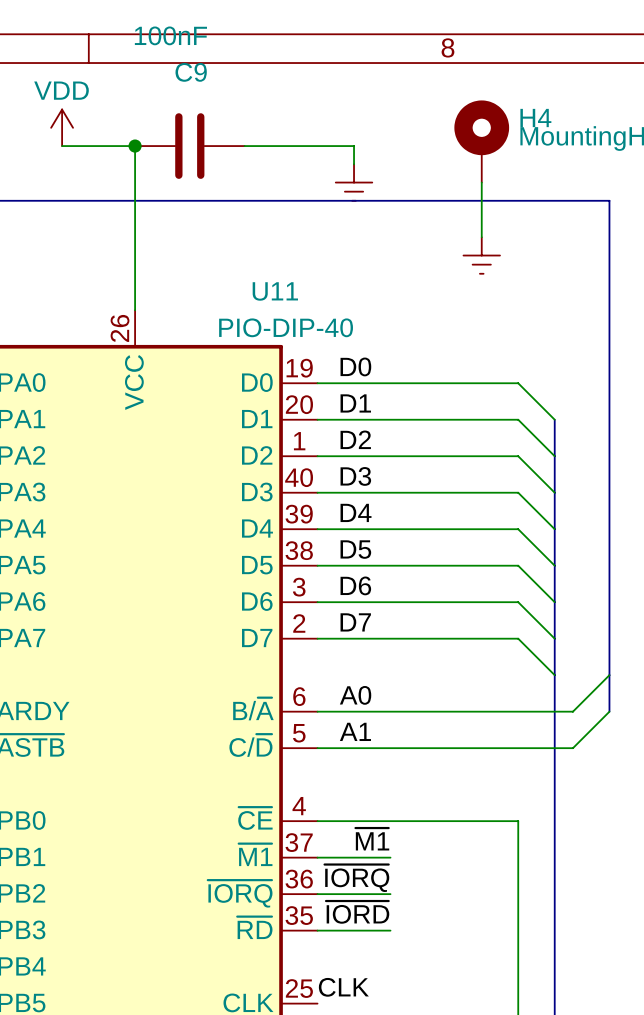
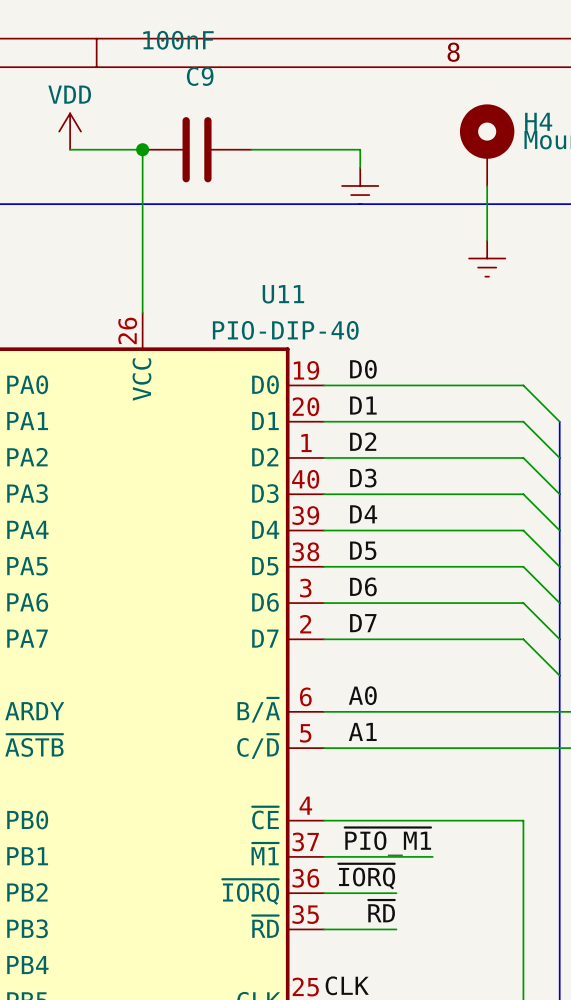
label: ~{M1} (372, 839) -> ~{PIO_M1} (387, 841)
wire: none -> (396, 856) (432, 856)
label: ~{IORD} (357, 912) -> ~{RD} (381, 911)

